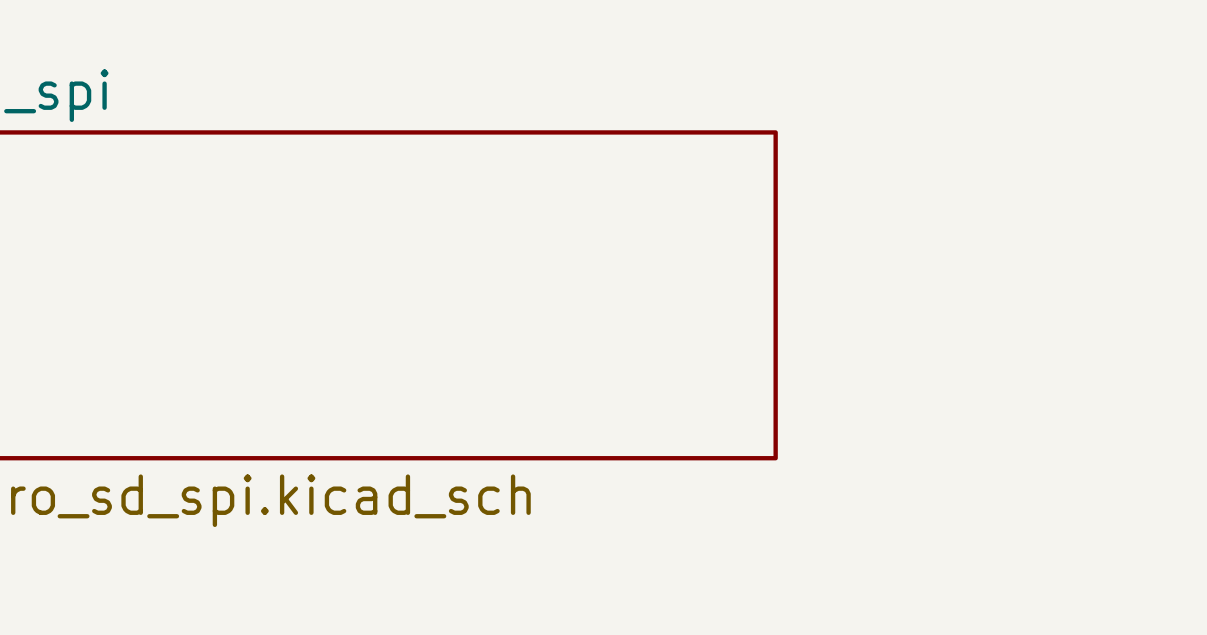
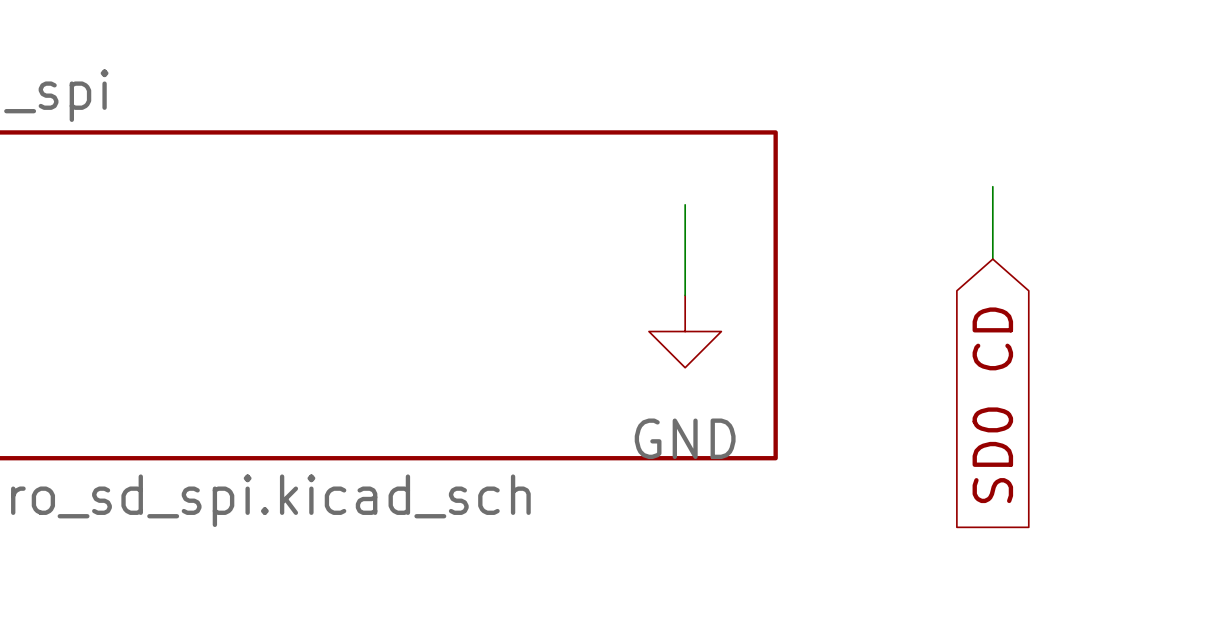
wire: none -> (992, 186) (992, 259)
wire: none -> (685, 204) (685, 295)
power symbol: none -> GND (685, 331)
global label: none -> SD0 CD (992, 405)

